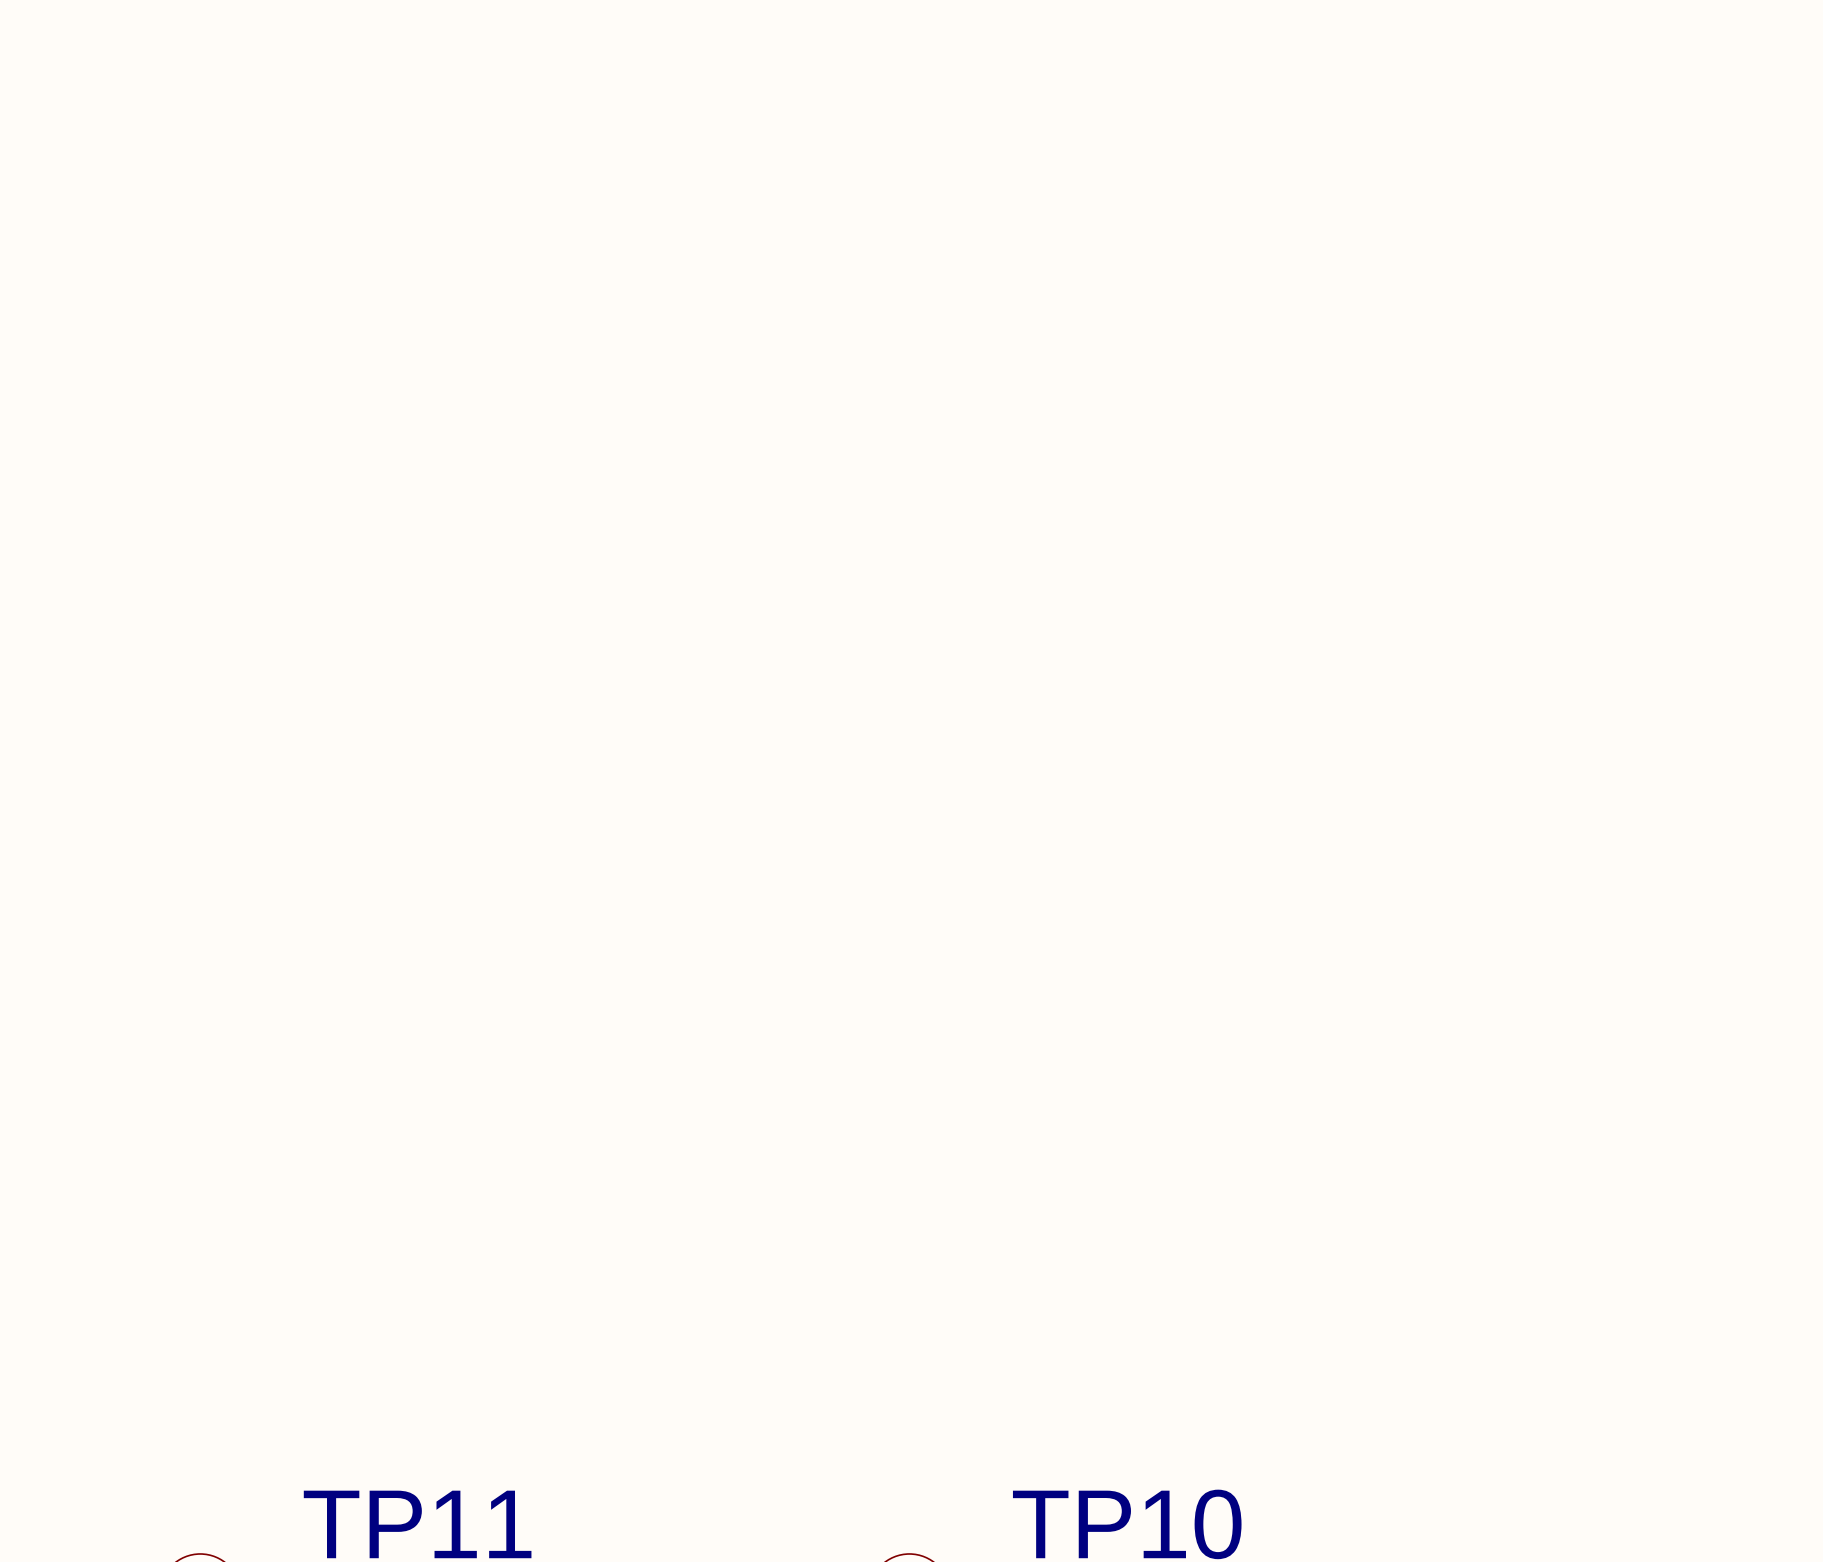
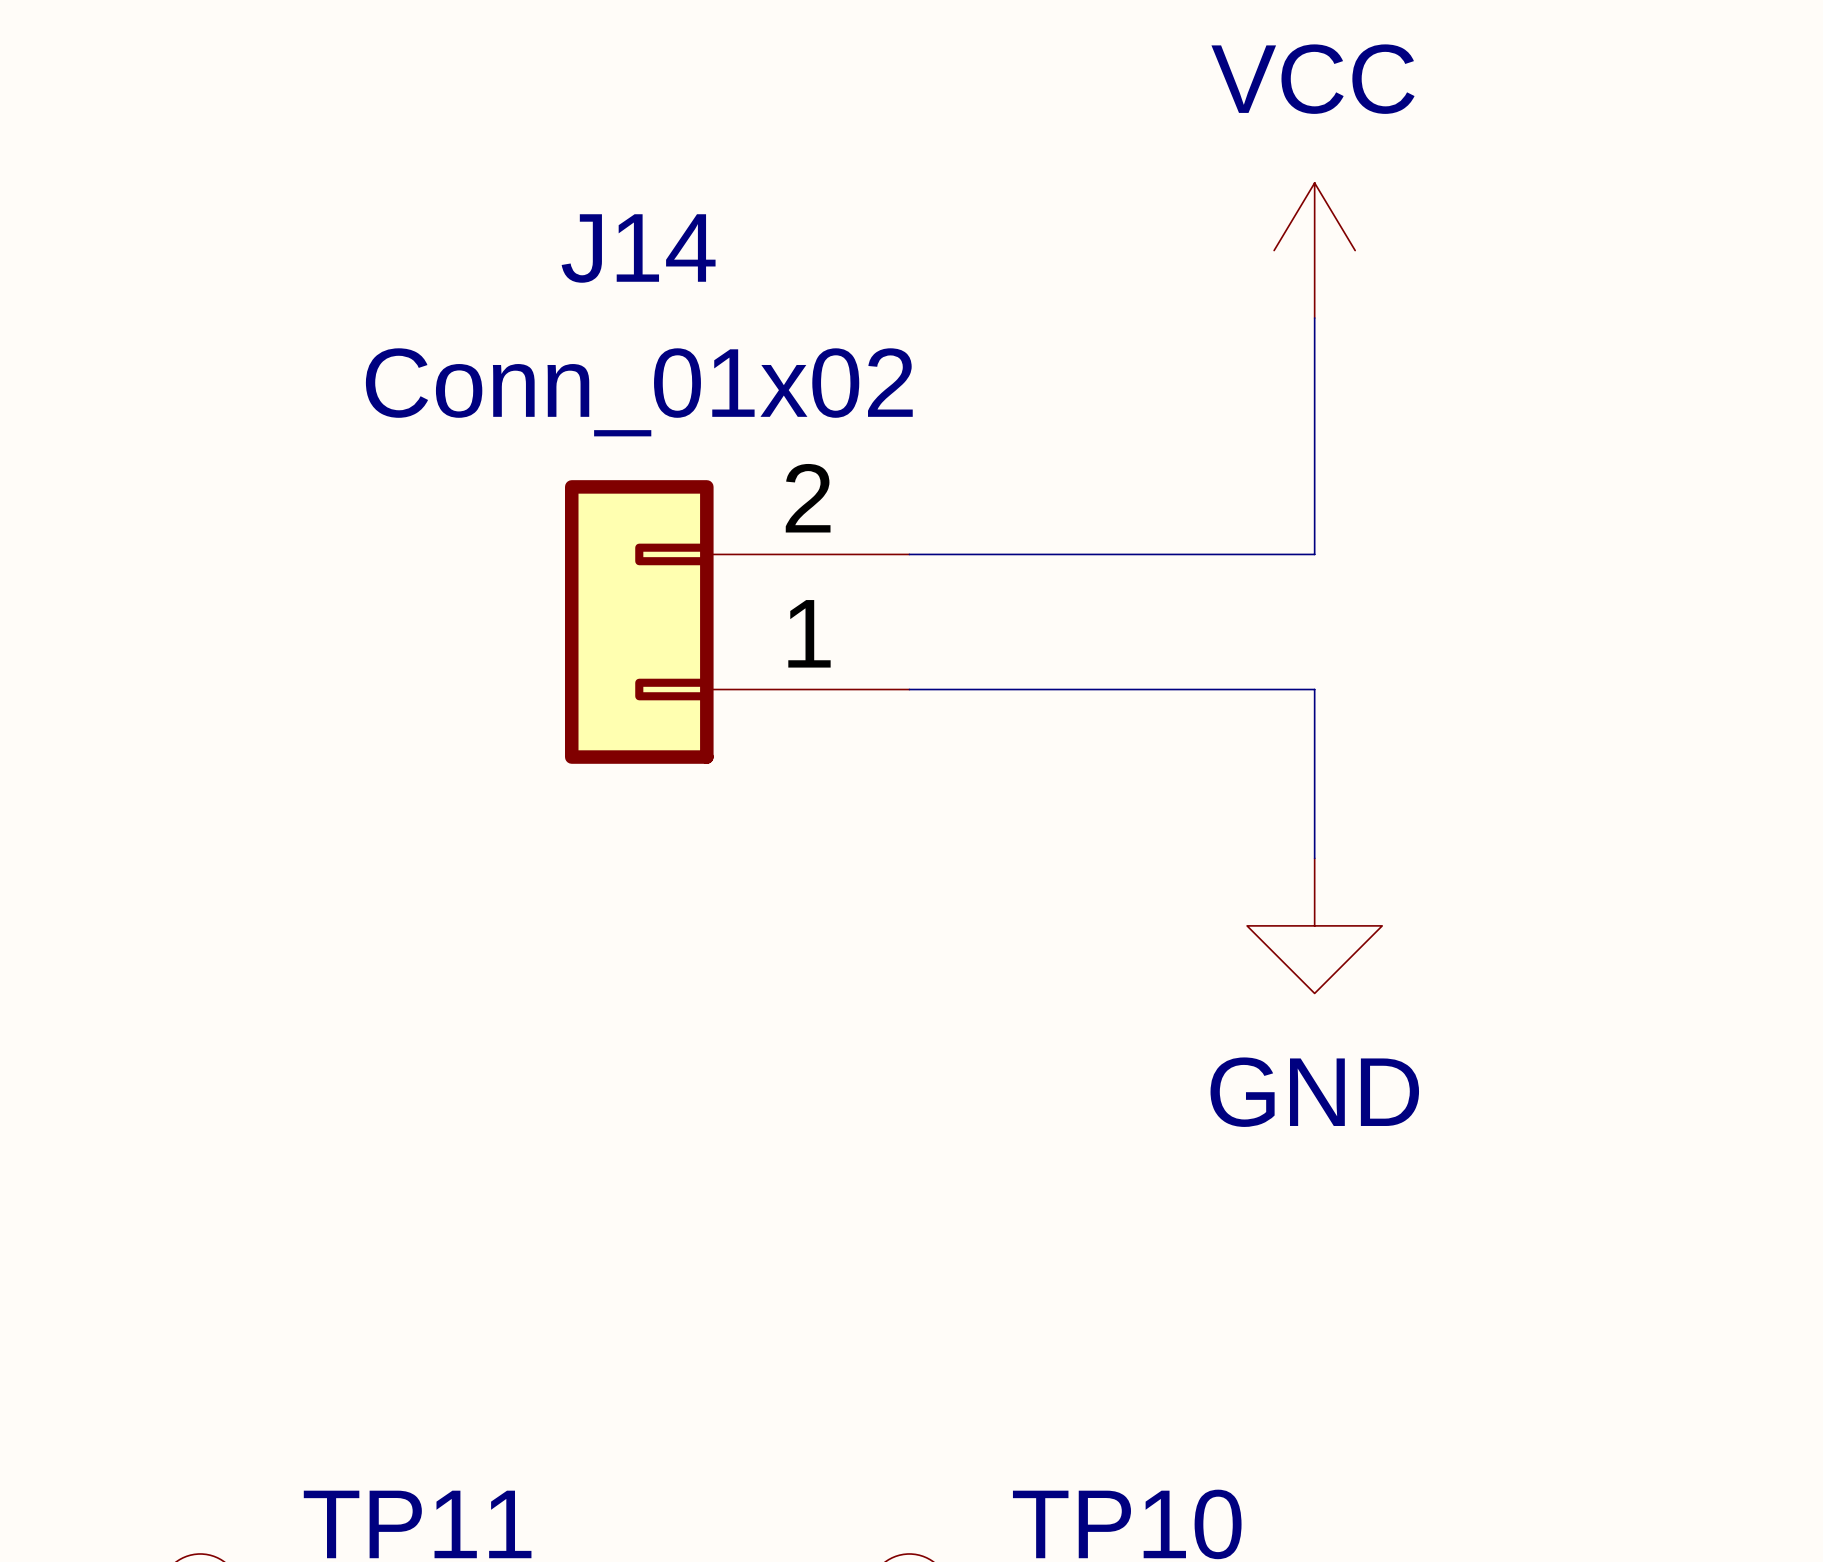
power symbol: none -> VCC (1314, 250)
wire: none -> (1314, 318) (1314, 554) (909, 554)
J14: none -> Conn_01x02 (737, 621)
wire: none -> (909, 689) (1314, 689) (1314, 858)
power symbol: none -> GND (1314, 925)

